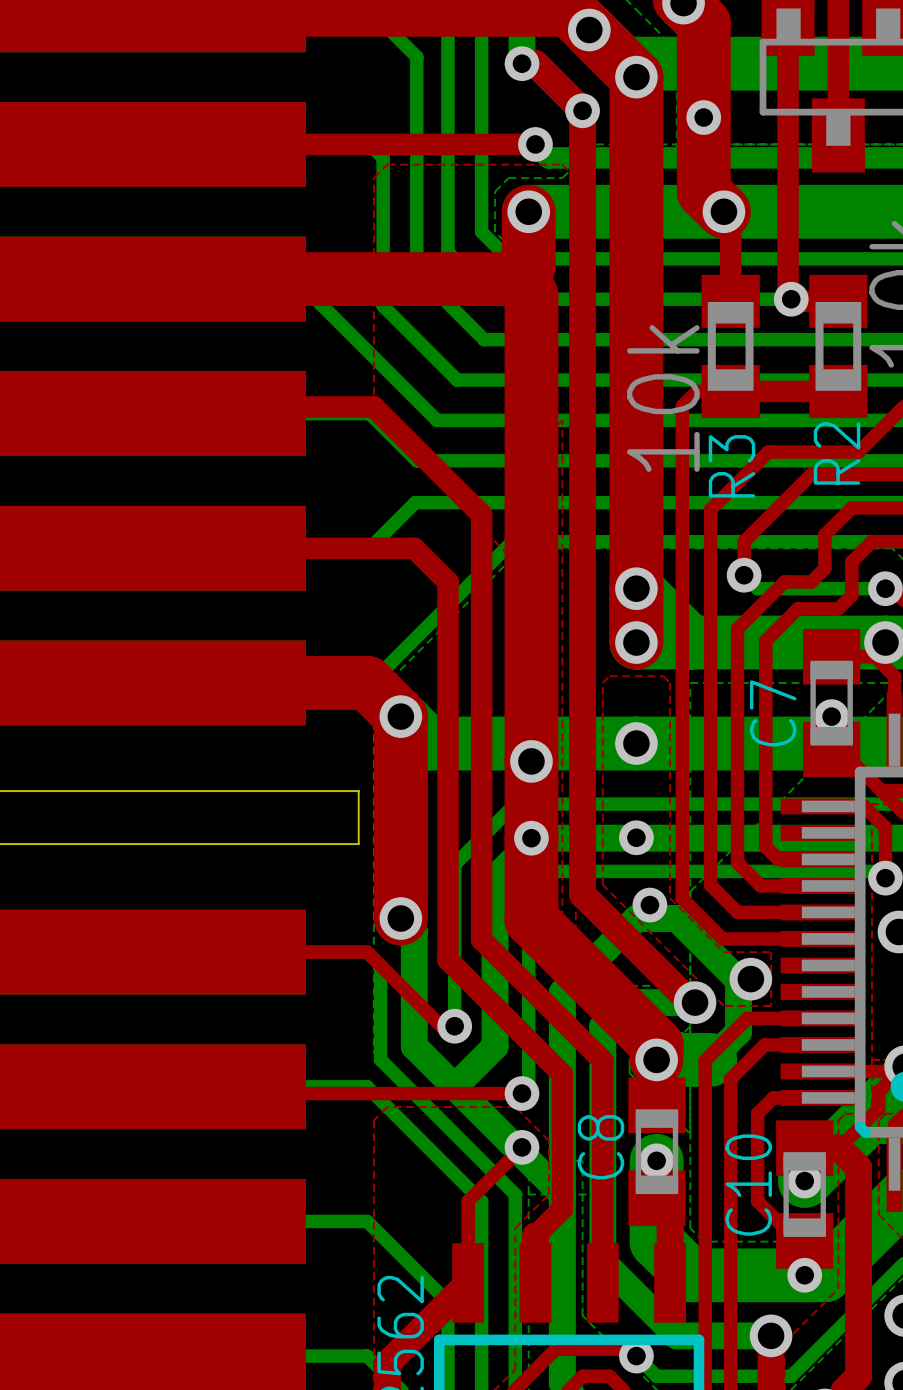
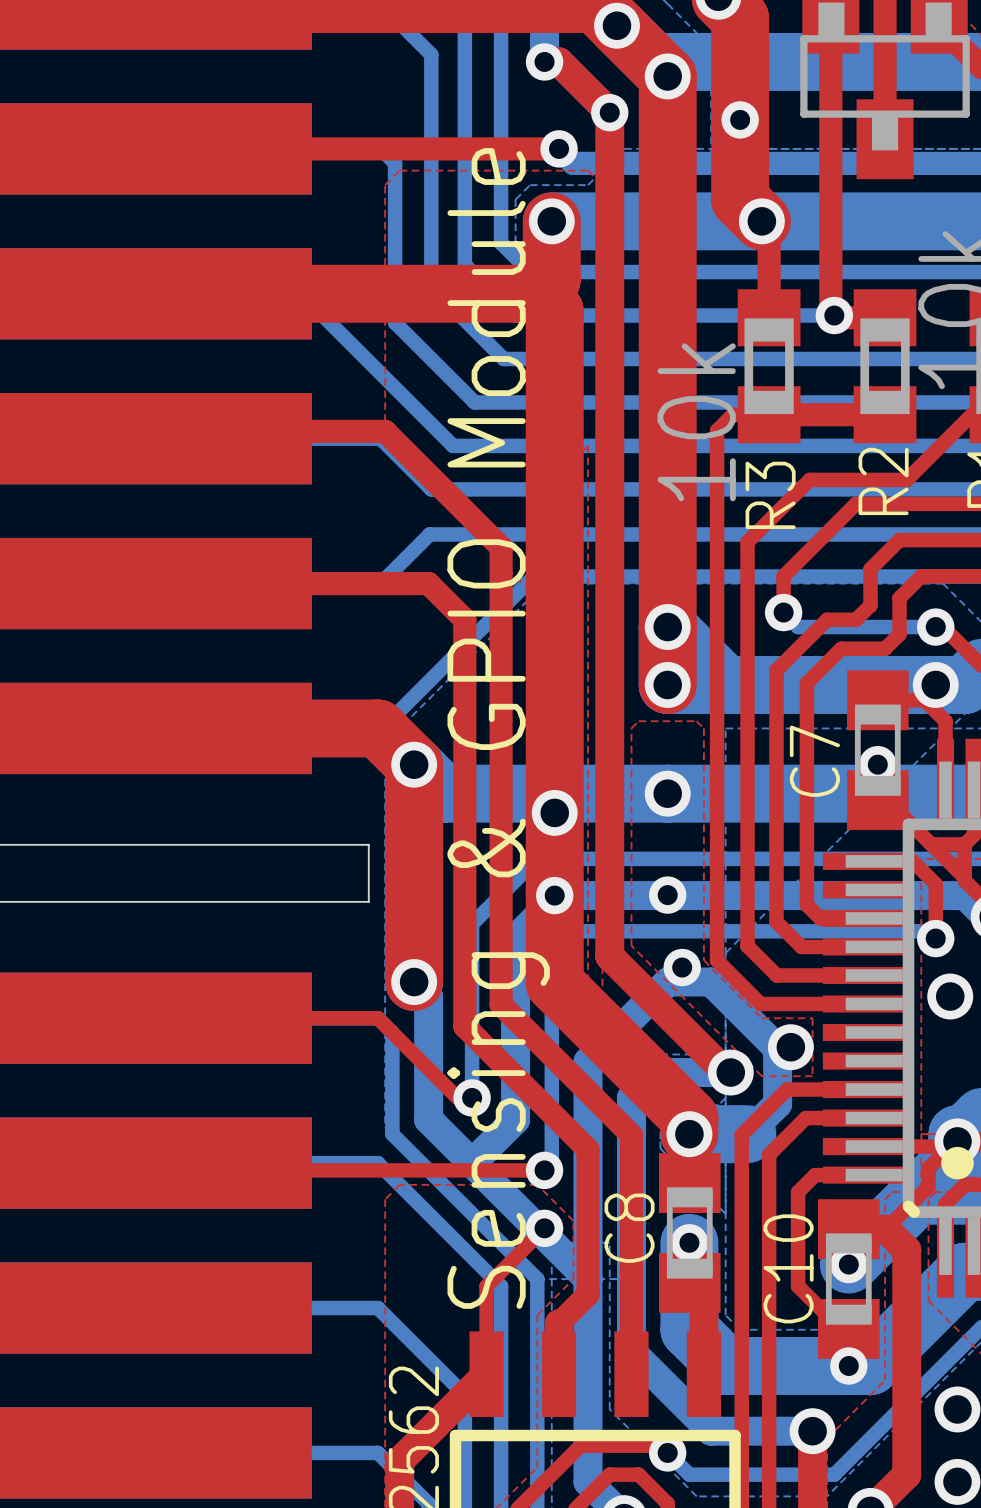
text: none -> Sensing & GPIO Module (498, 728)

